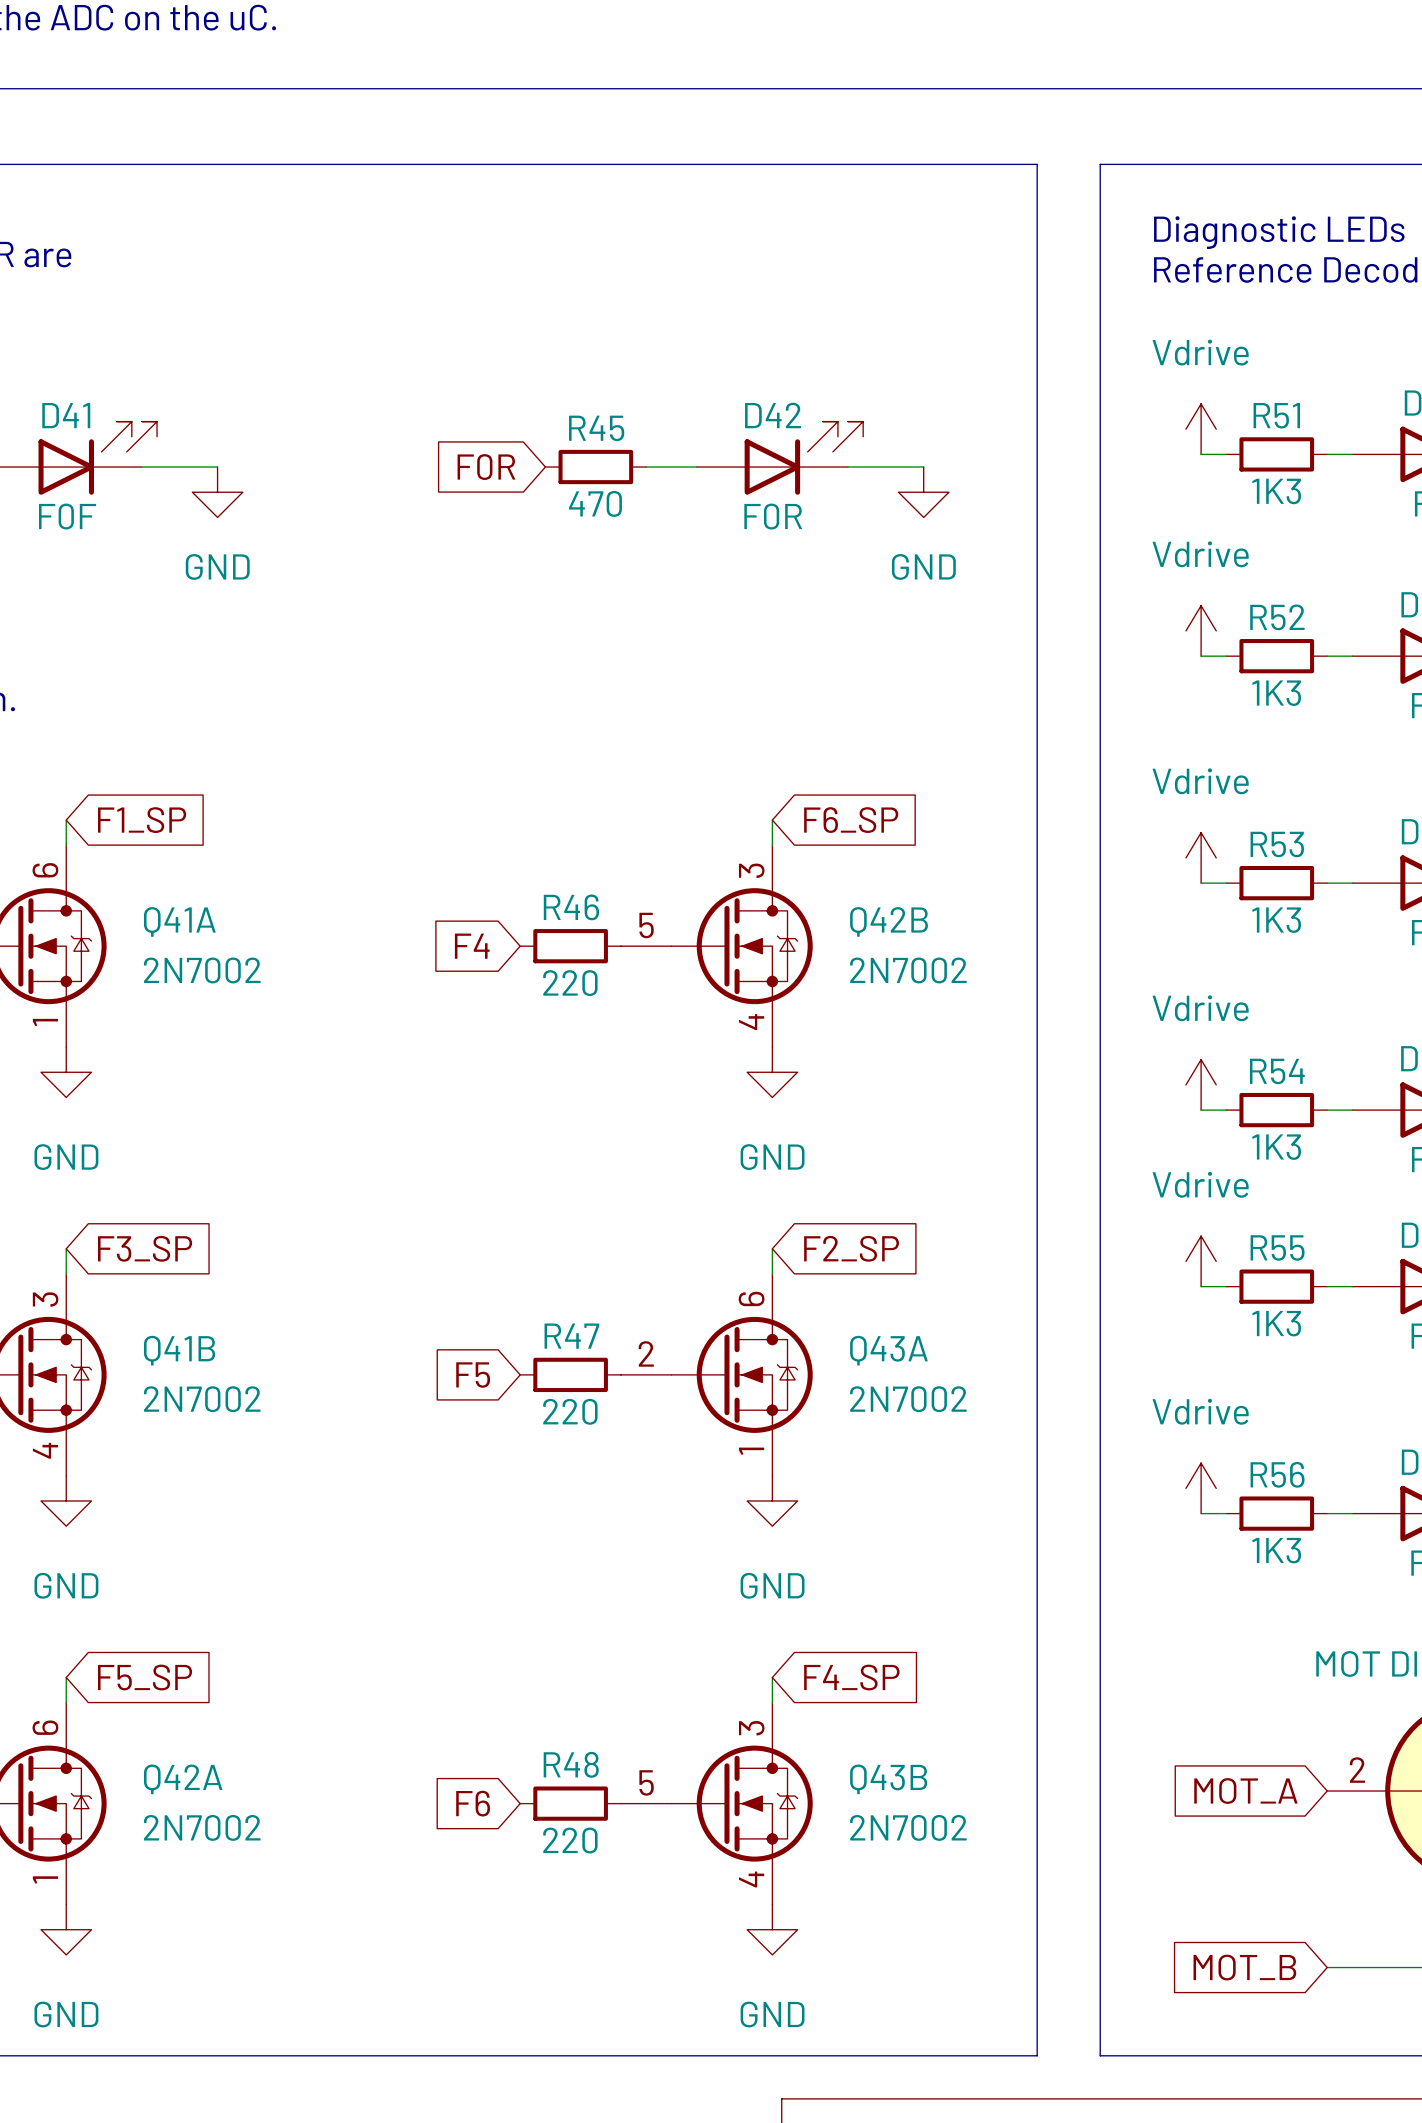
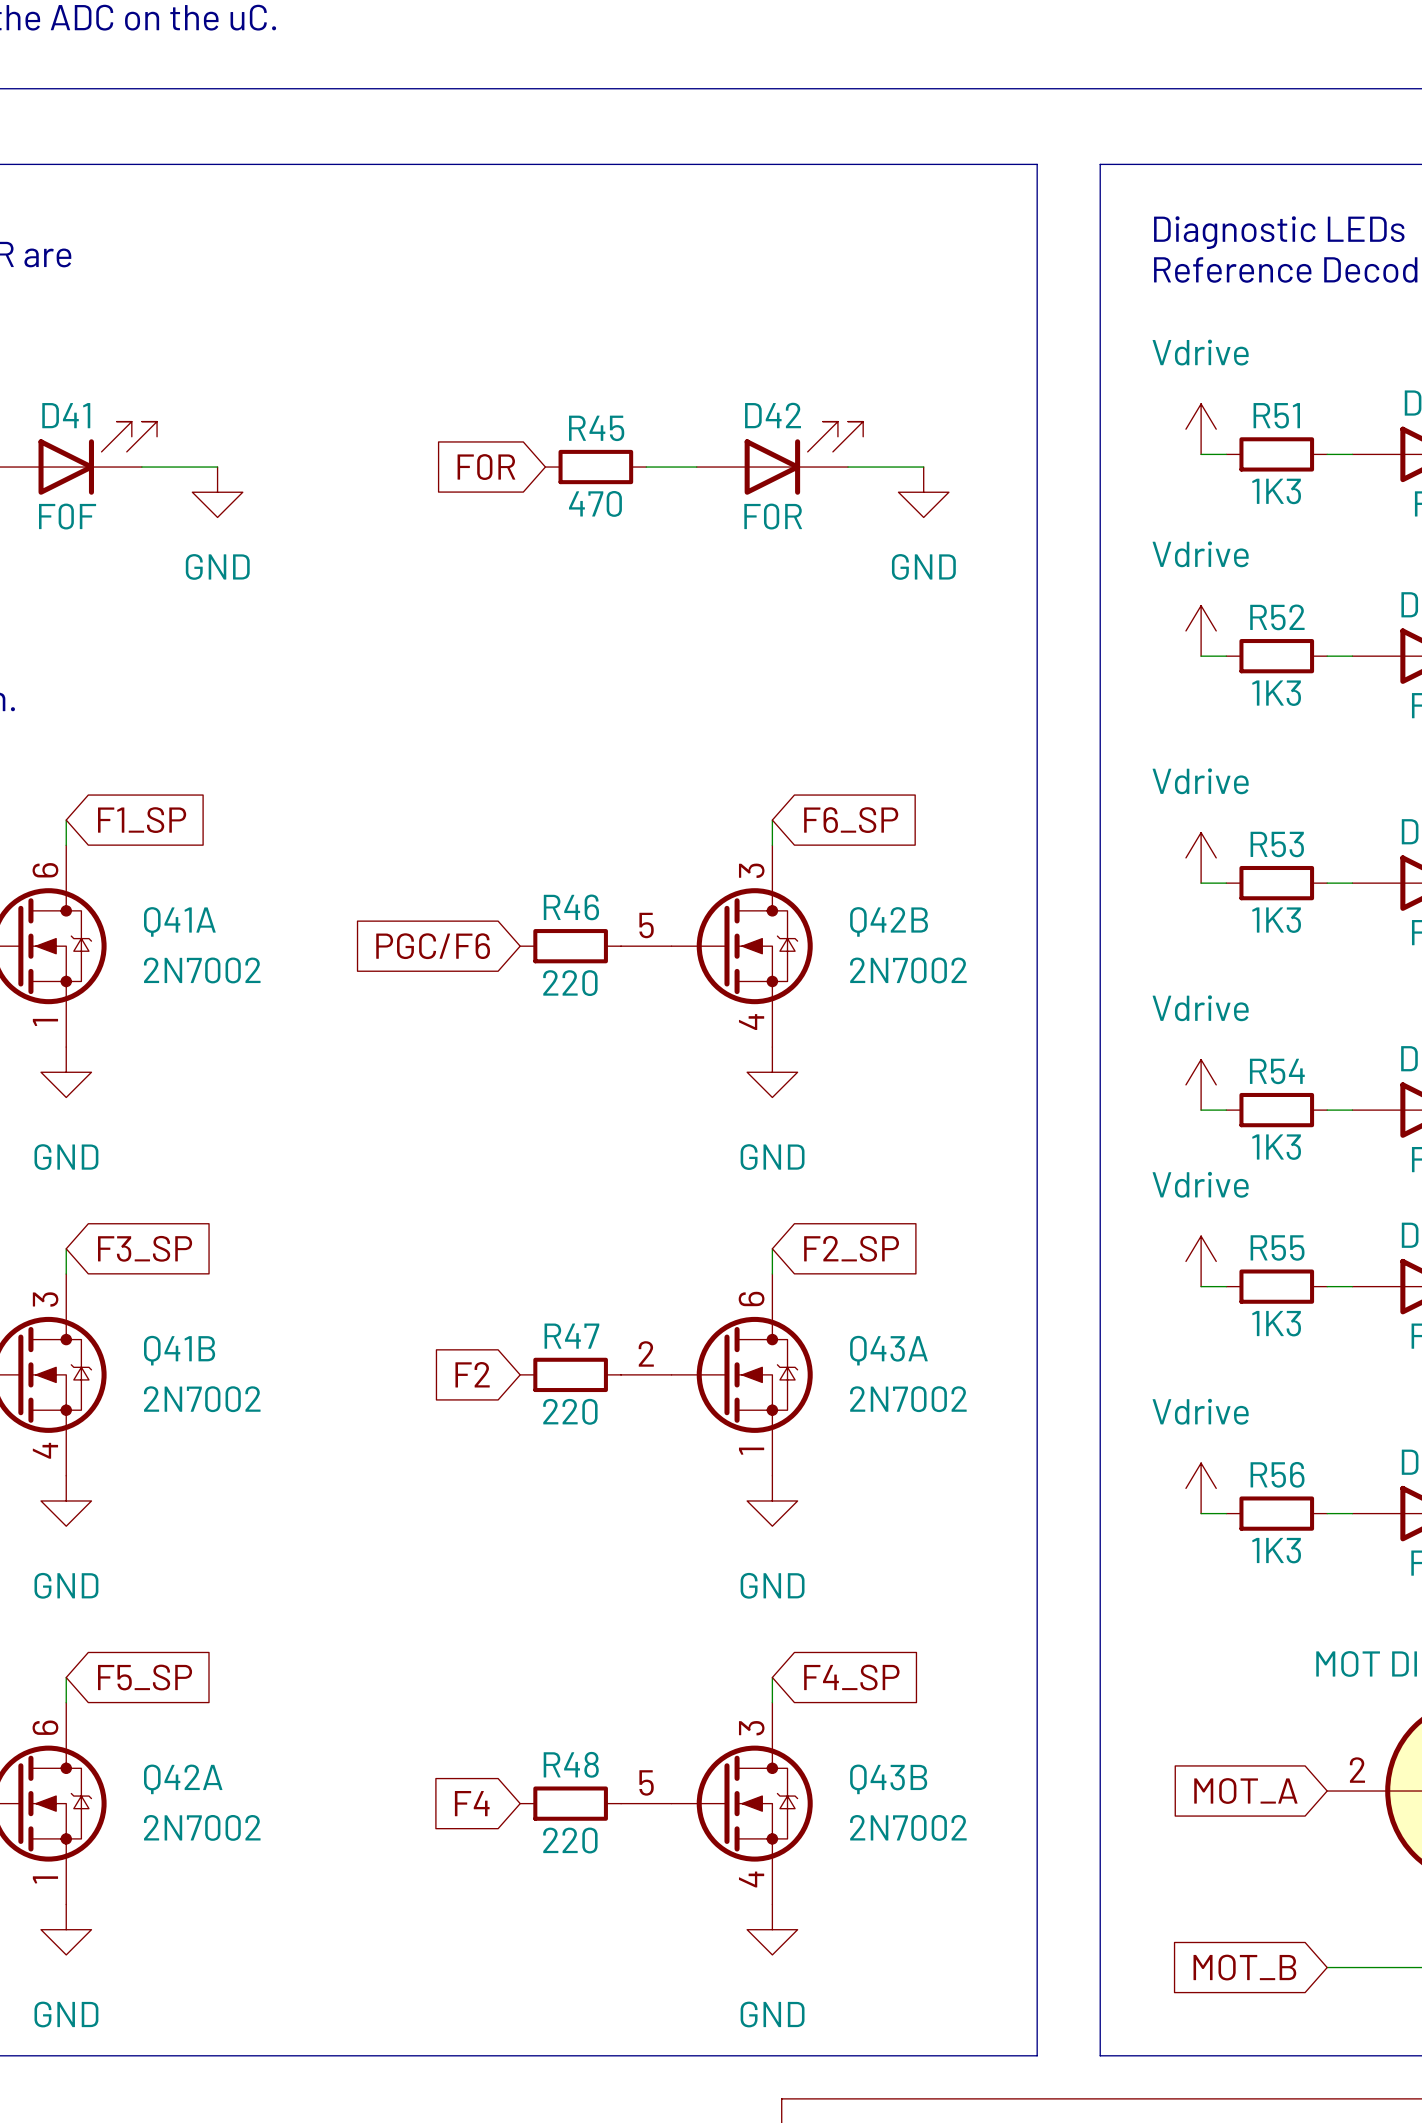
global label: F4 (472, 946) -> PGC/F6 (433, 946)
global label: F5 (473, 1375) -> F2 (472, 1374)
global label: F6 (473, 1803) -> F4 (472, 1803)

